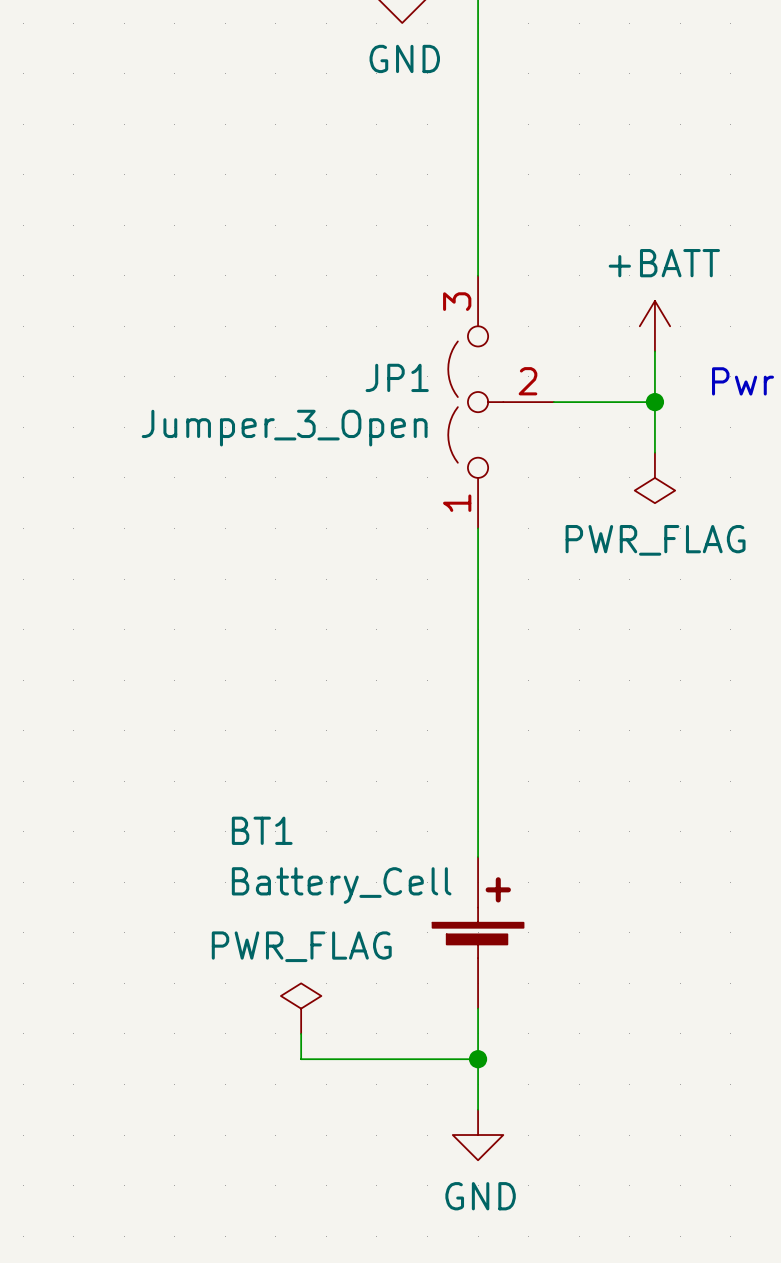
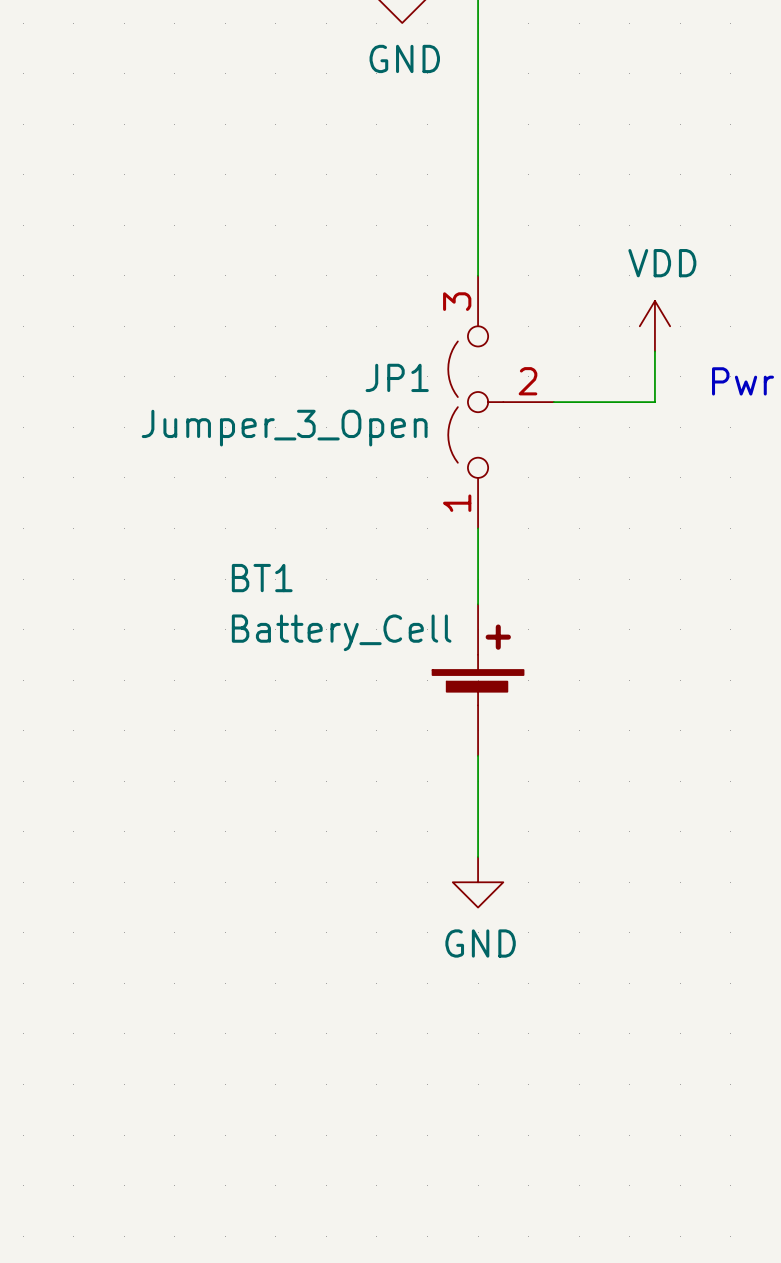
power symbol: +BATT (654, 326) -> VDD (654, 326)
wire: (654, 402) (654, 452) -> none
junction: (654, 402) -> none
power symbol: PWR_FLAG (654, 477) -> none
BT1 position: (478, 932) -> (478, 680)
power symbol: PWR_FLAG (301, 1008) -> none
wire: (478, 1008) (478, 1109) -> none
wire: (301, 1033) (301, 1059) (478, 1059) -> none
junction: (478, 1059) -> none
power symbol position: GND (478, 1135) -> GND (478, 882)

